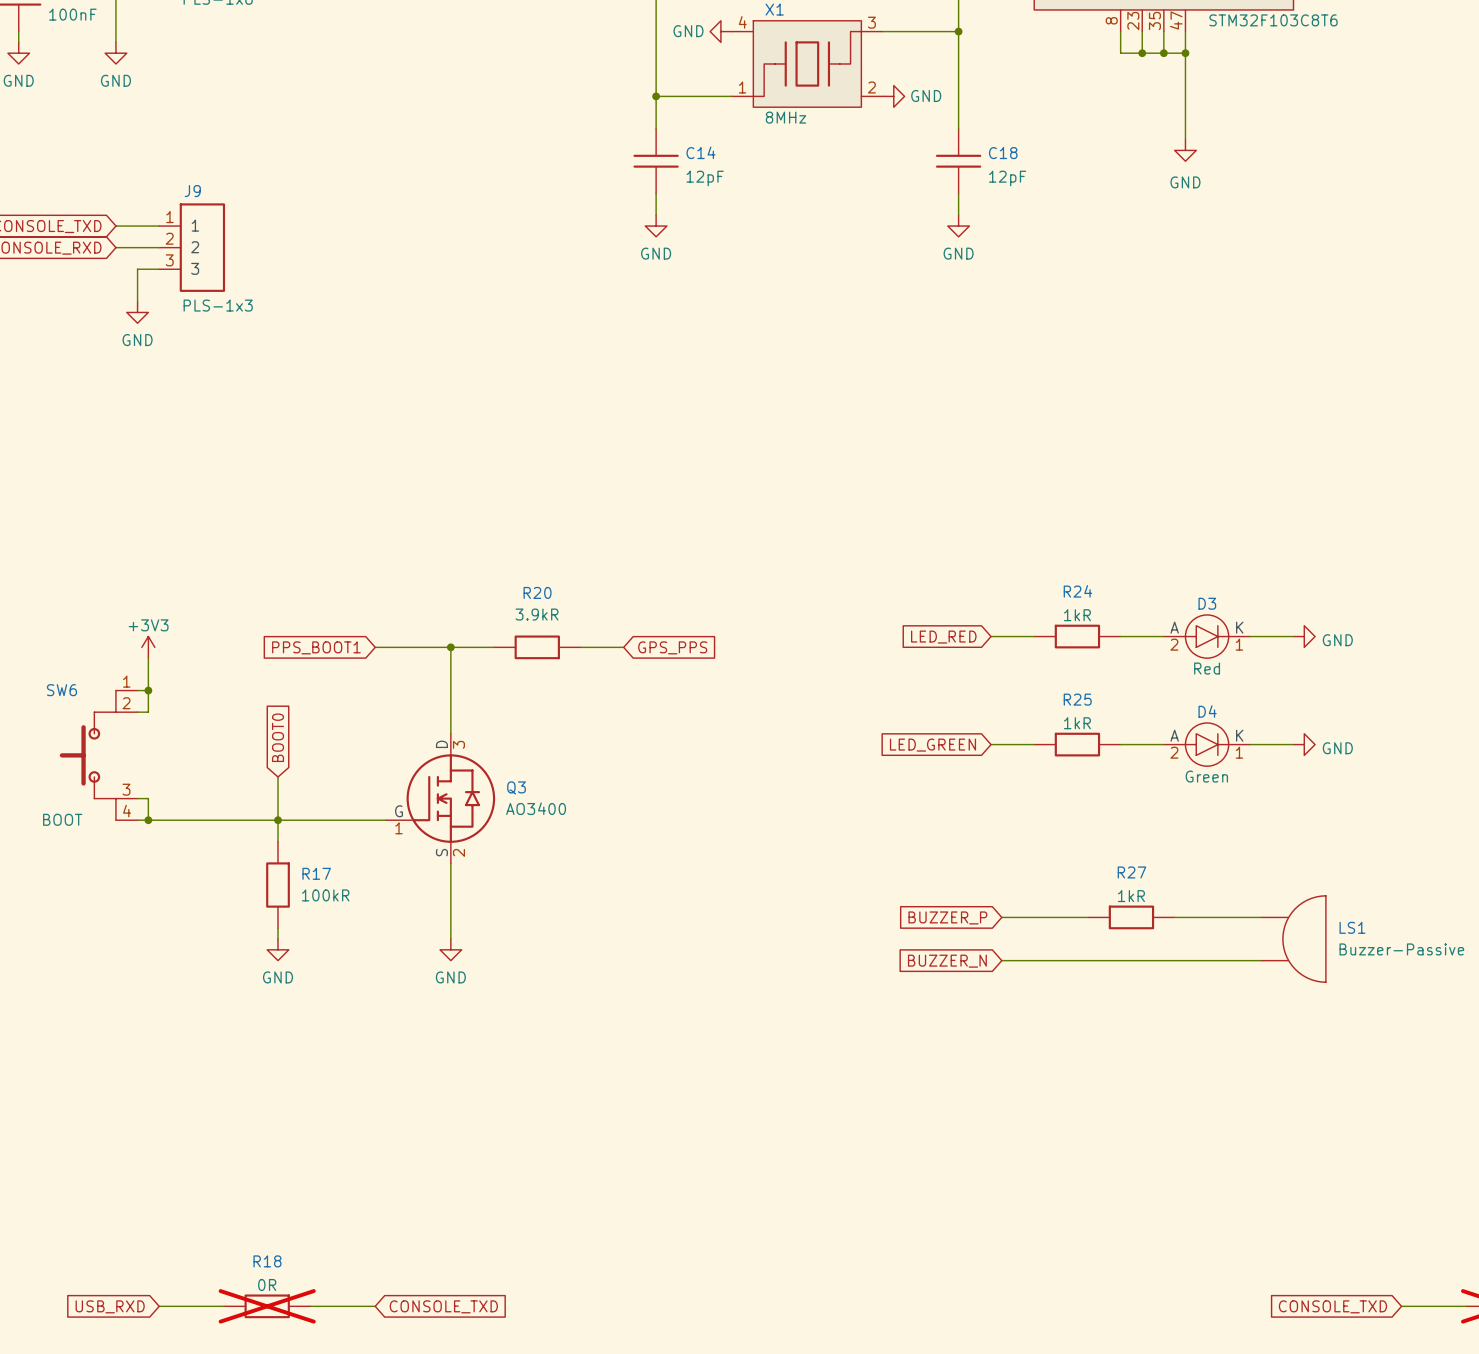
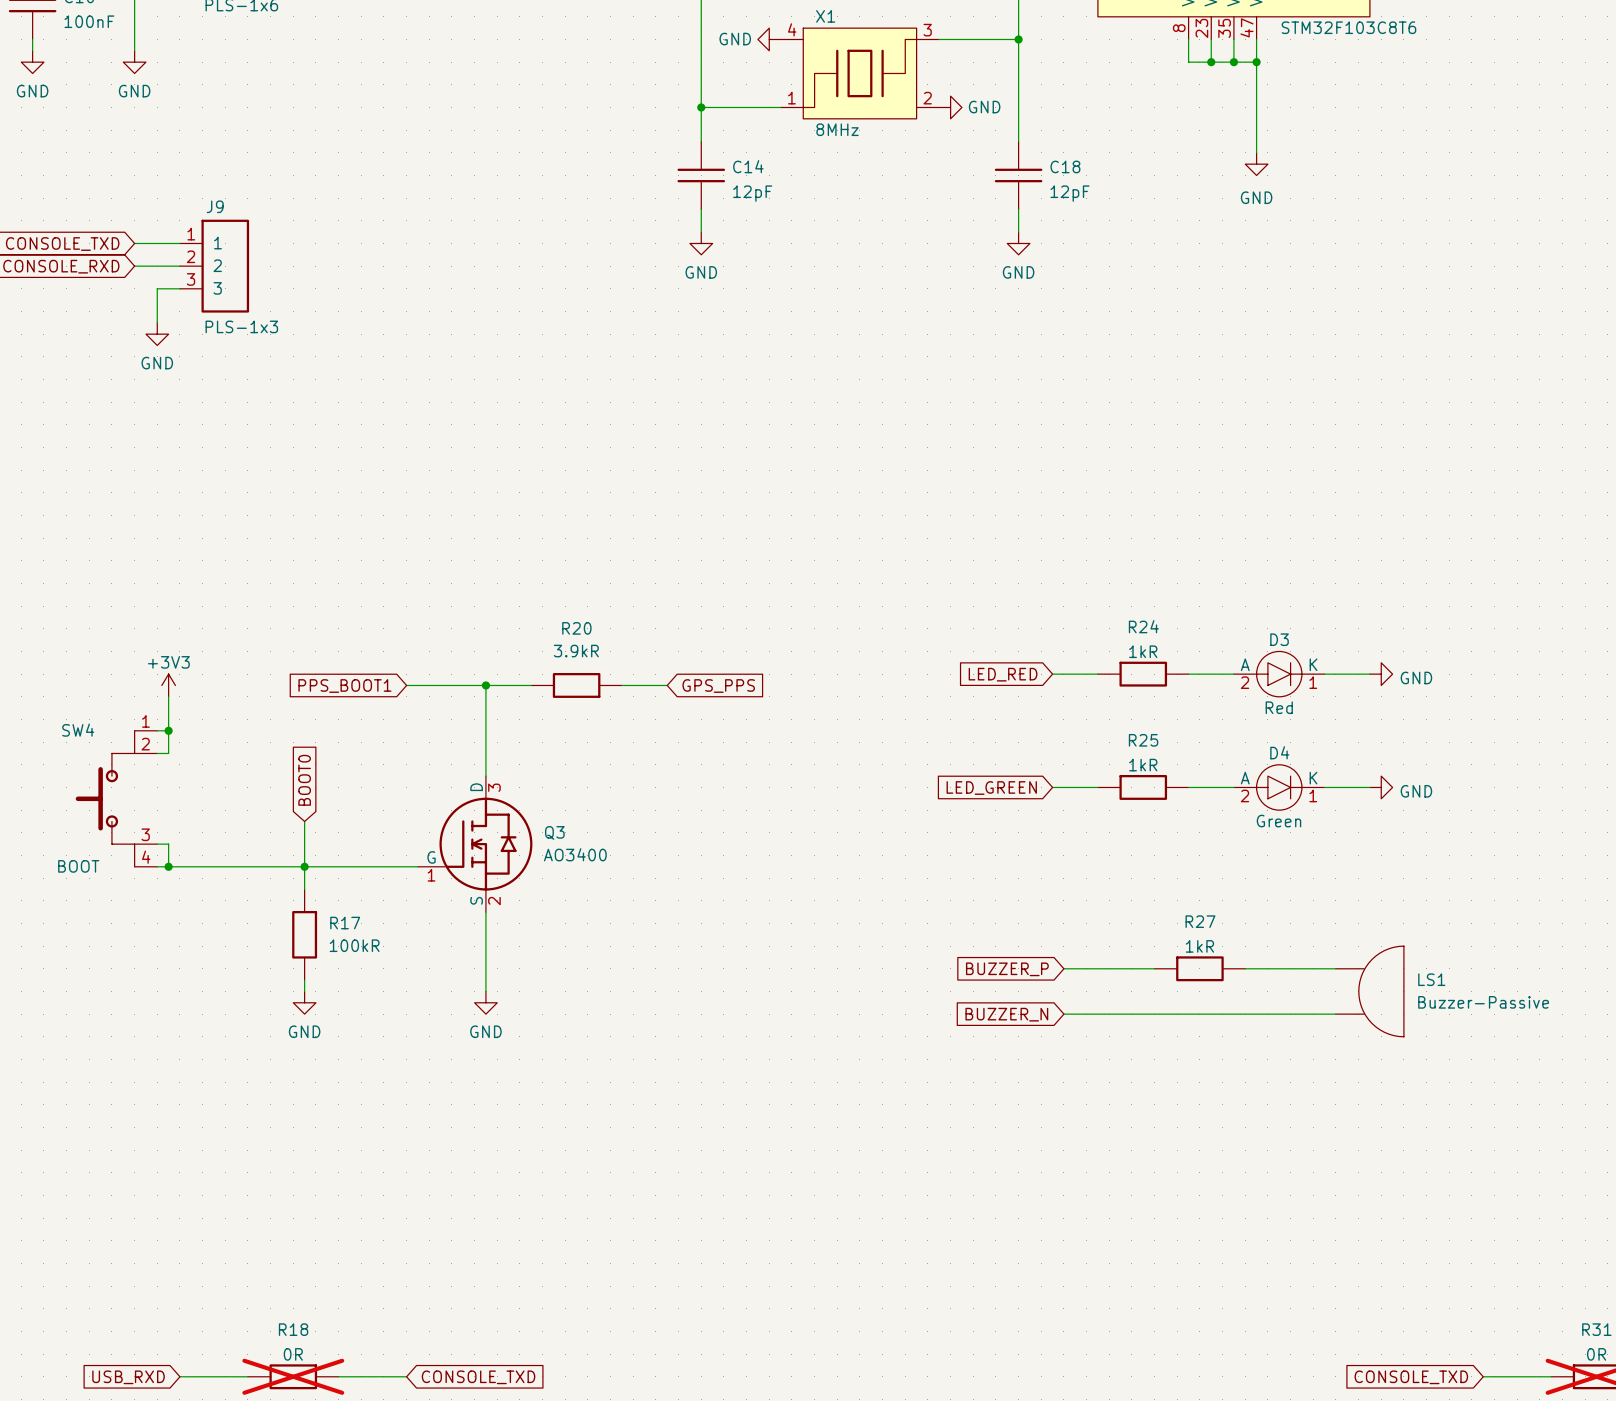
SW6 name: SW6 (61, 690) -> SW4 (78, 730)

